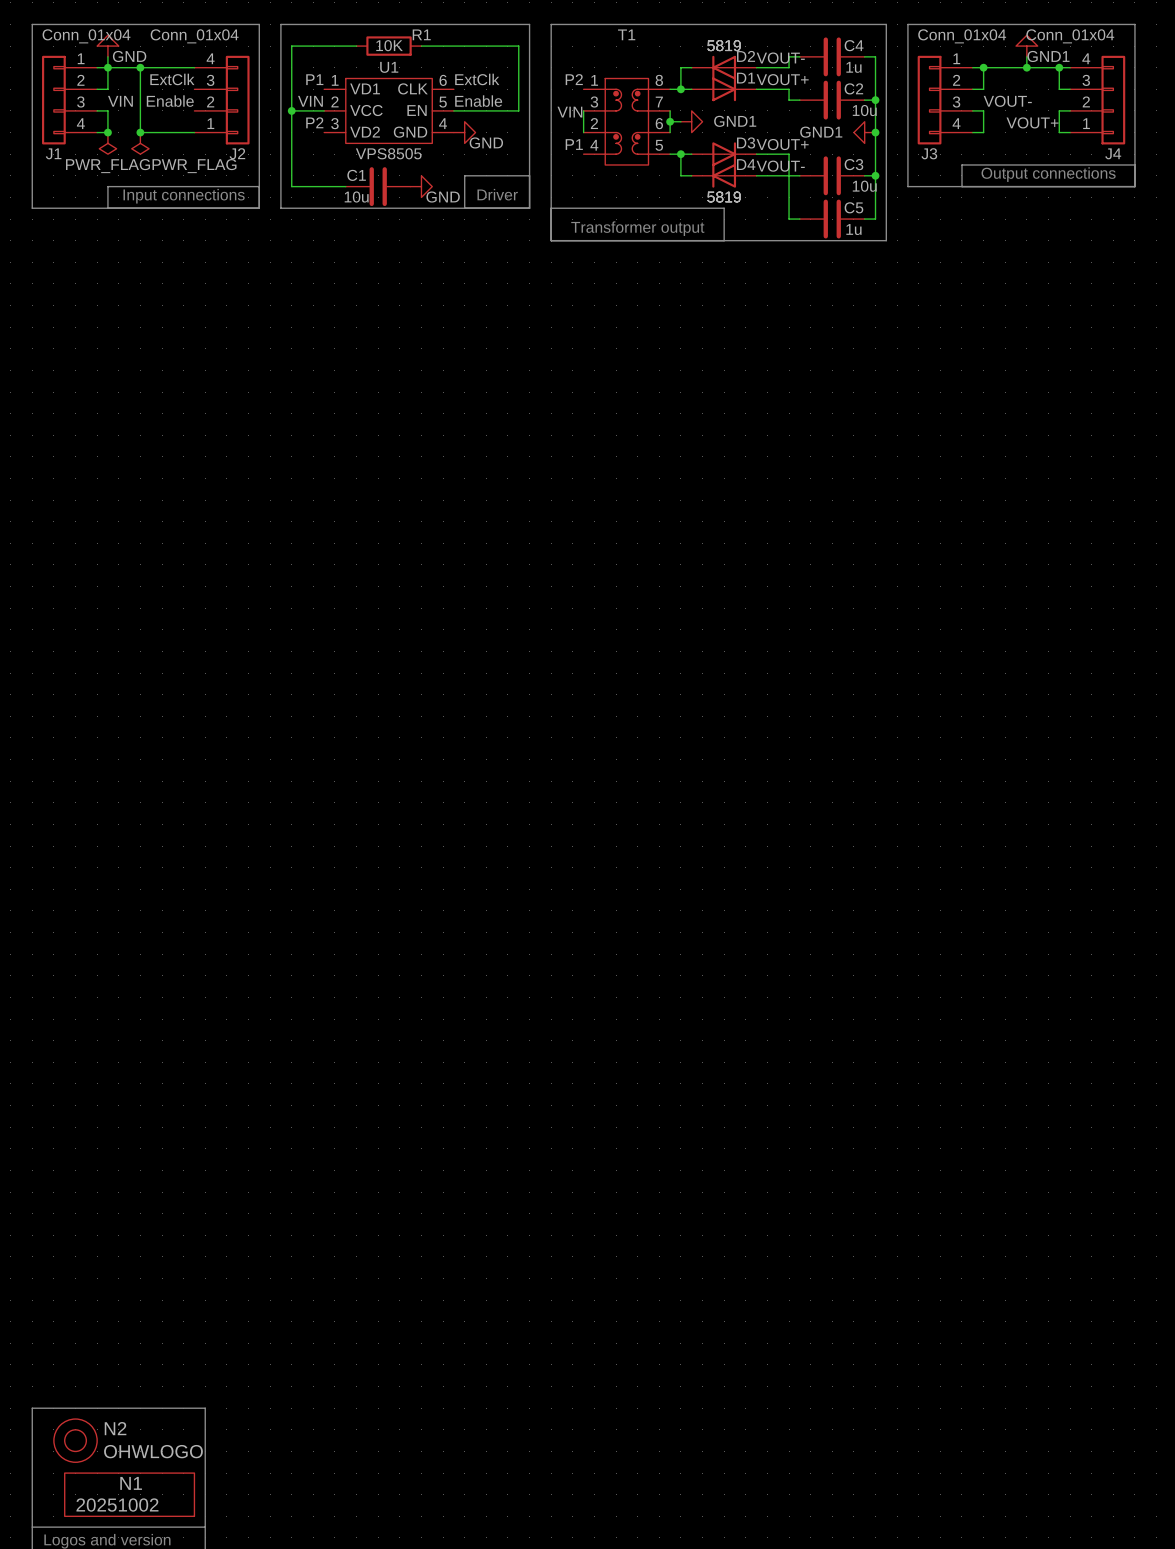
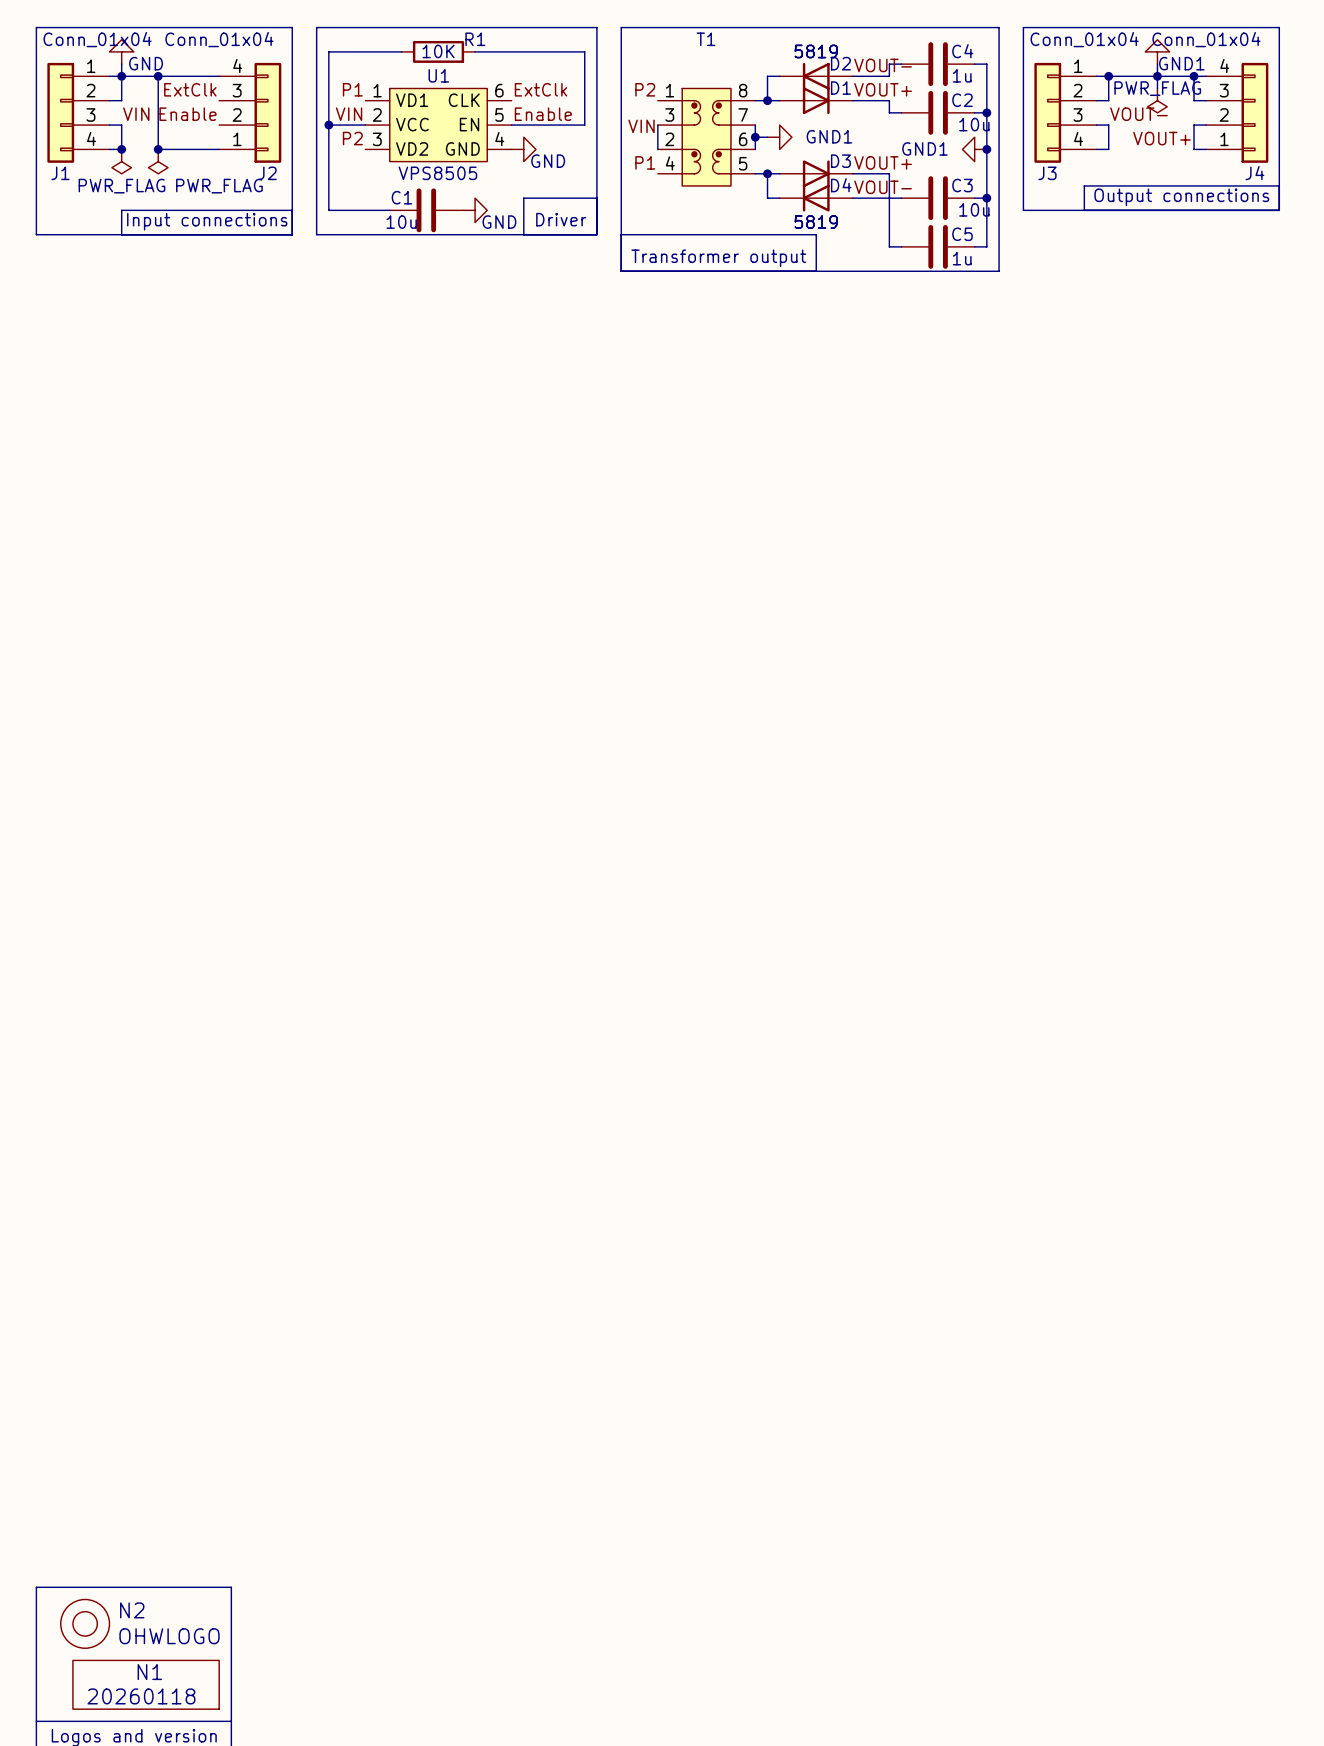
wire: none -> (1157, 76) (1157, 88)
power symbol: none -> PWR_FLAG (1157, 100)
N1 value: 20251002 (117, 1505) -> 20260118 (141, 1696)

